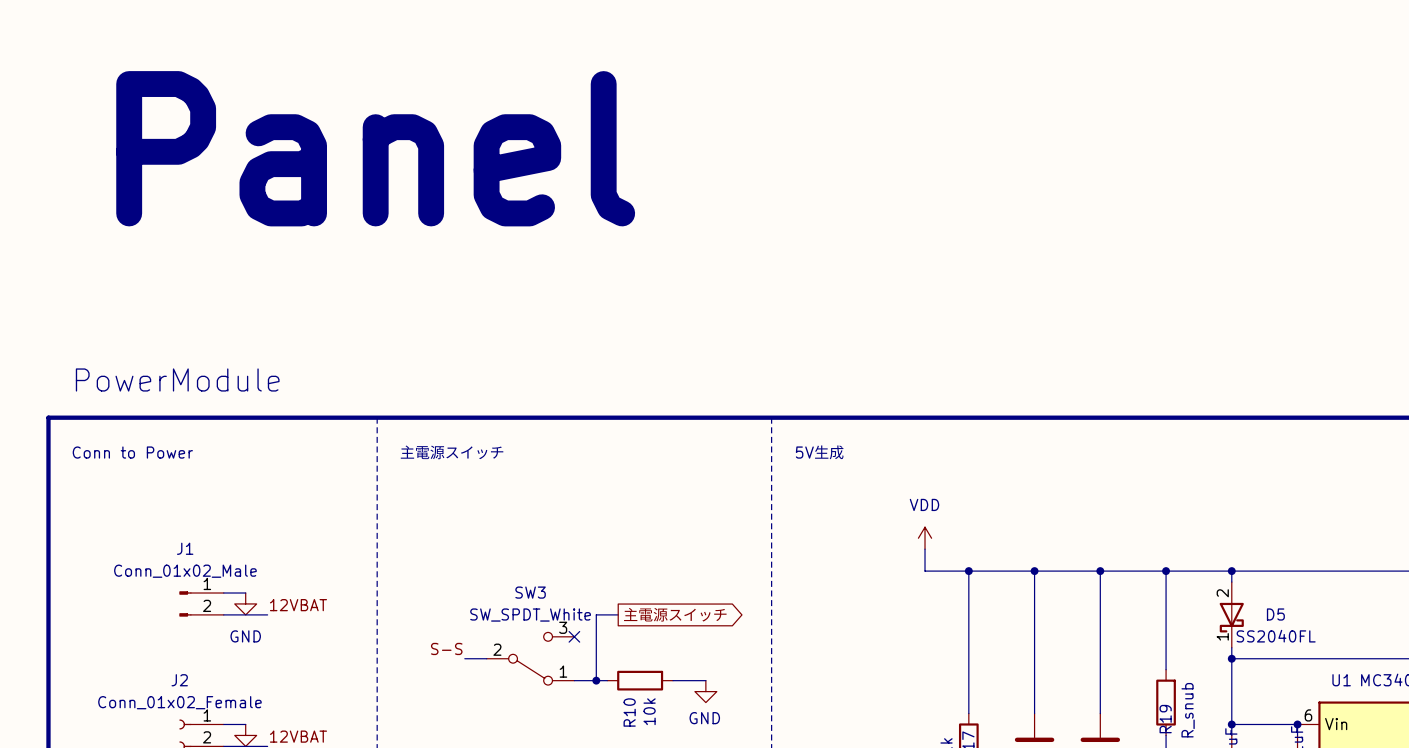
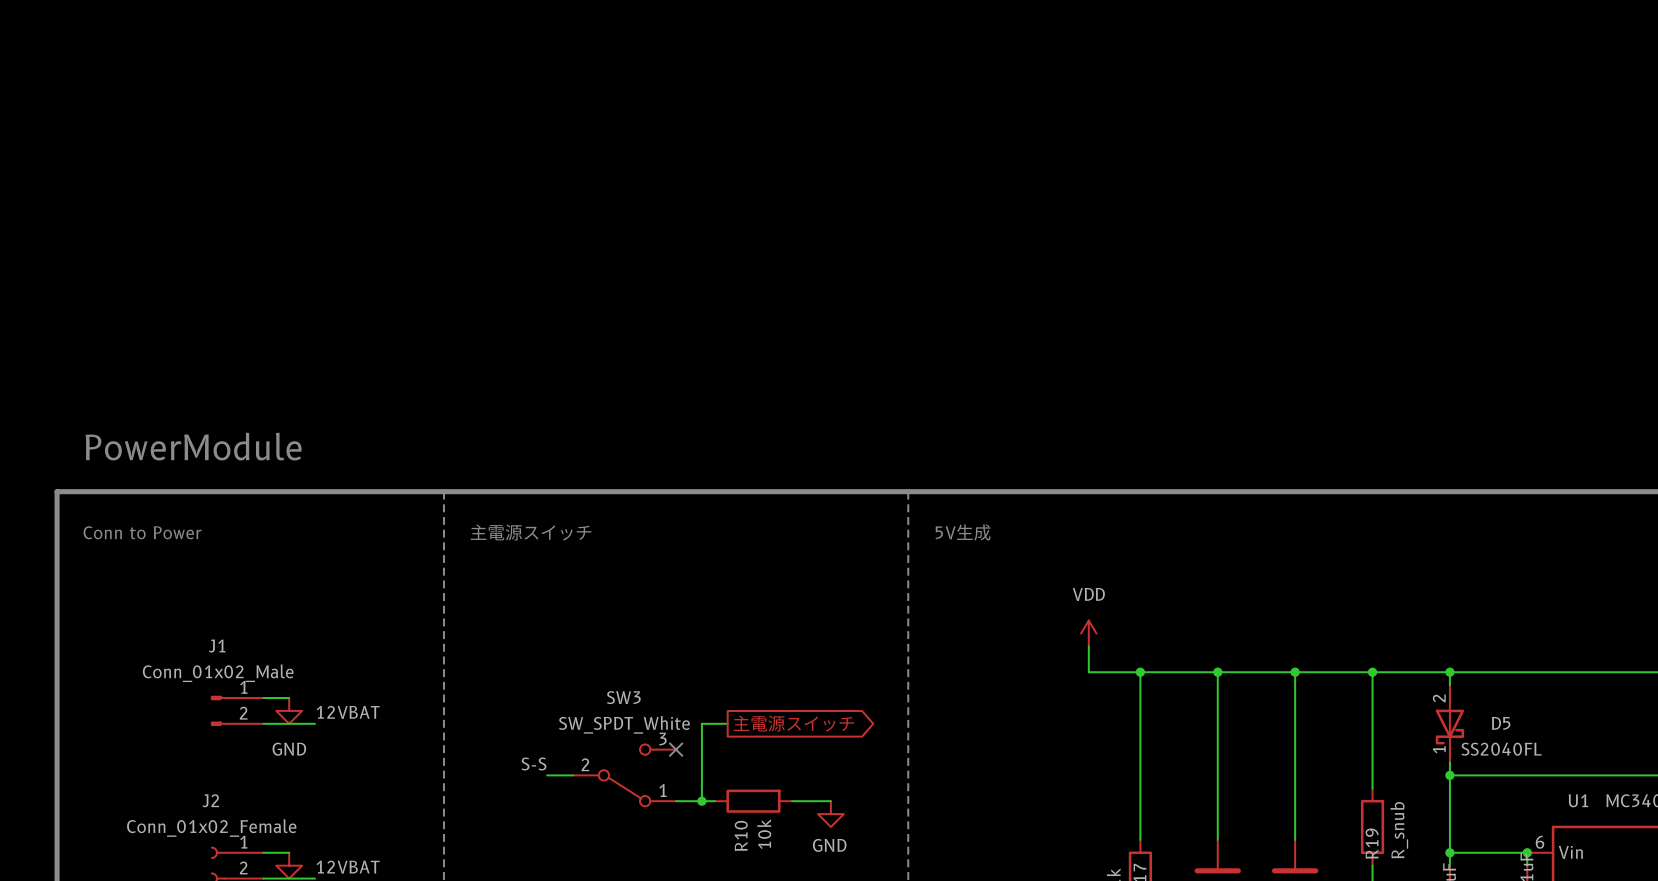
text: Panel (375, 148) -> none

